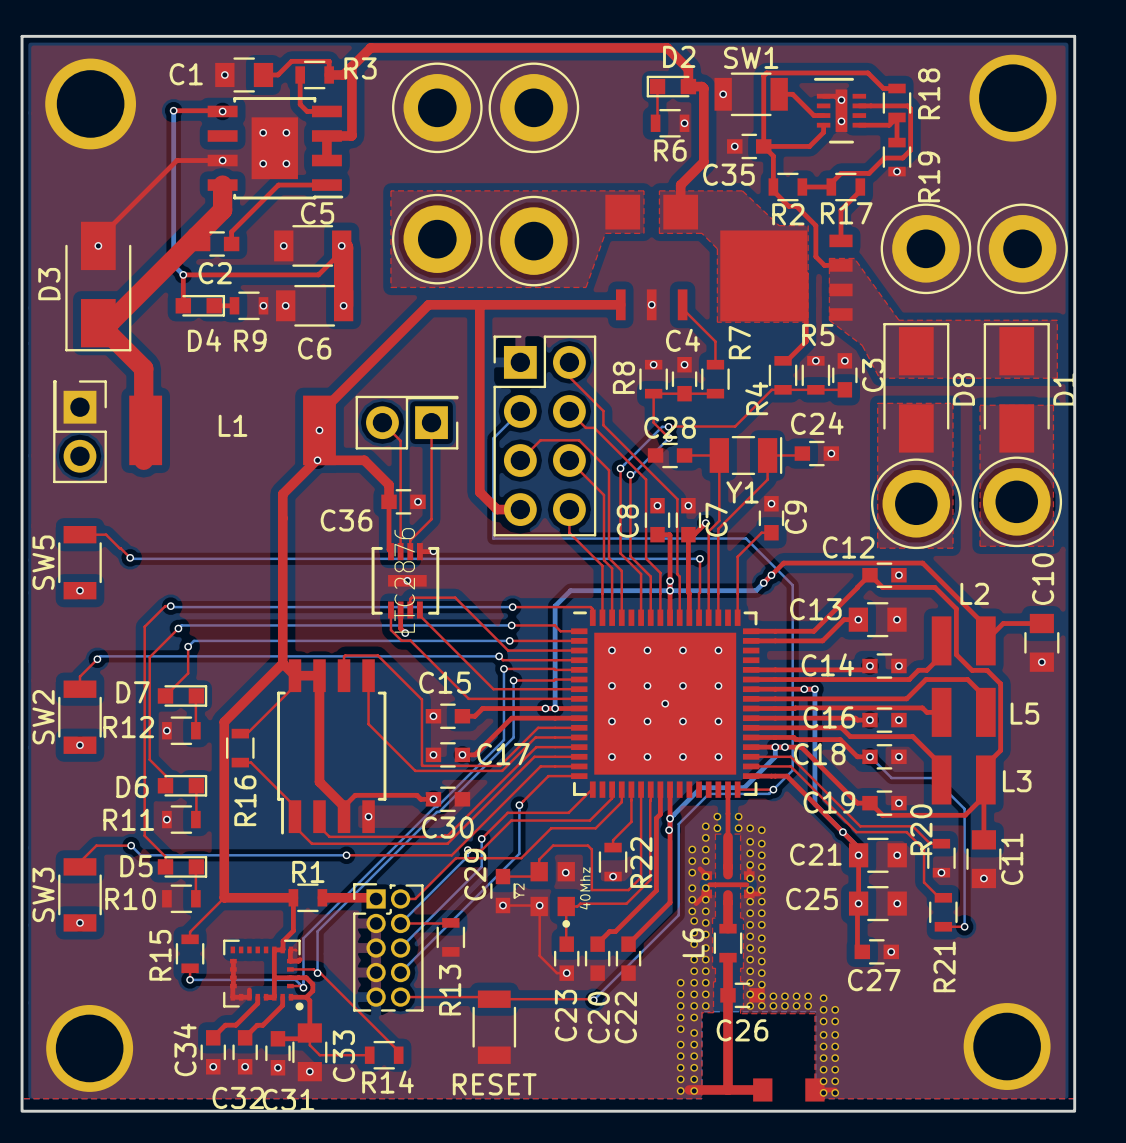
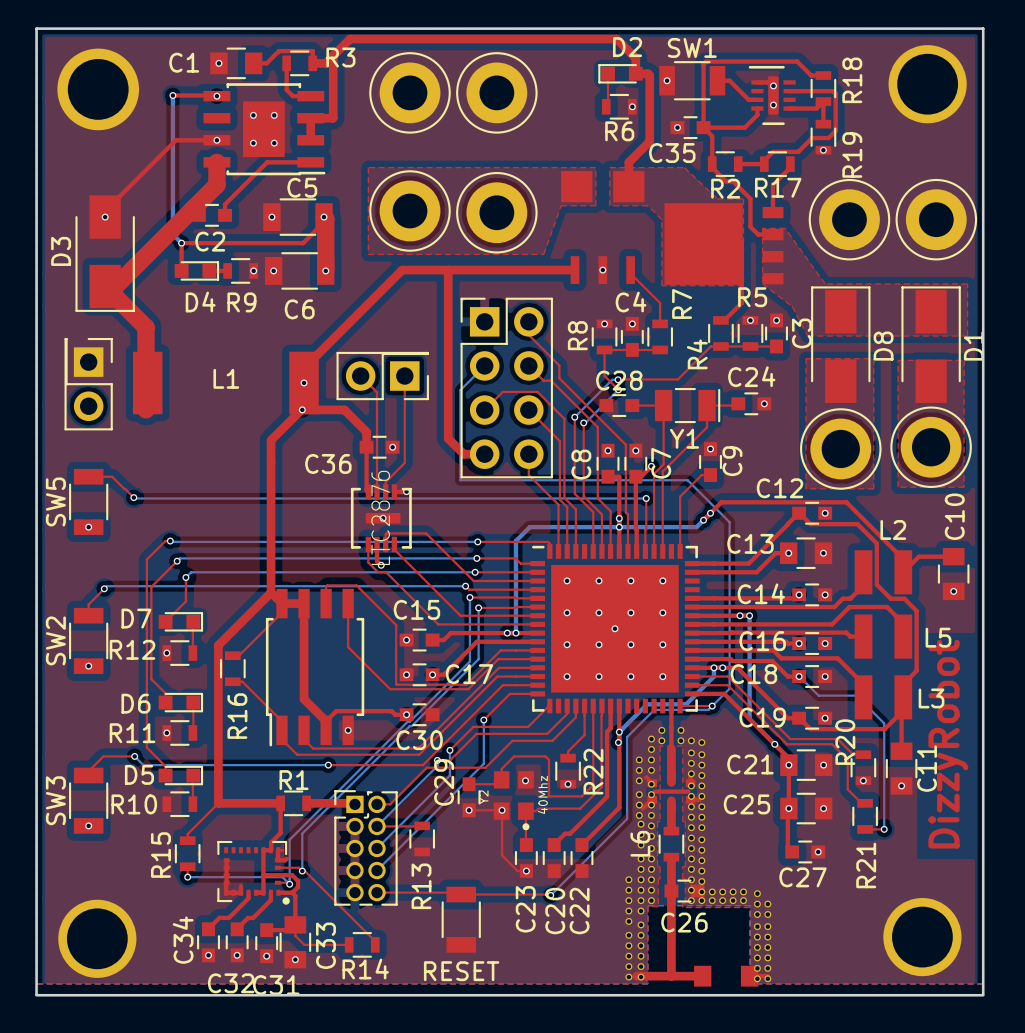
text: none -> DizzyRobot (948, 744)

